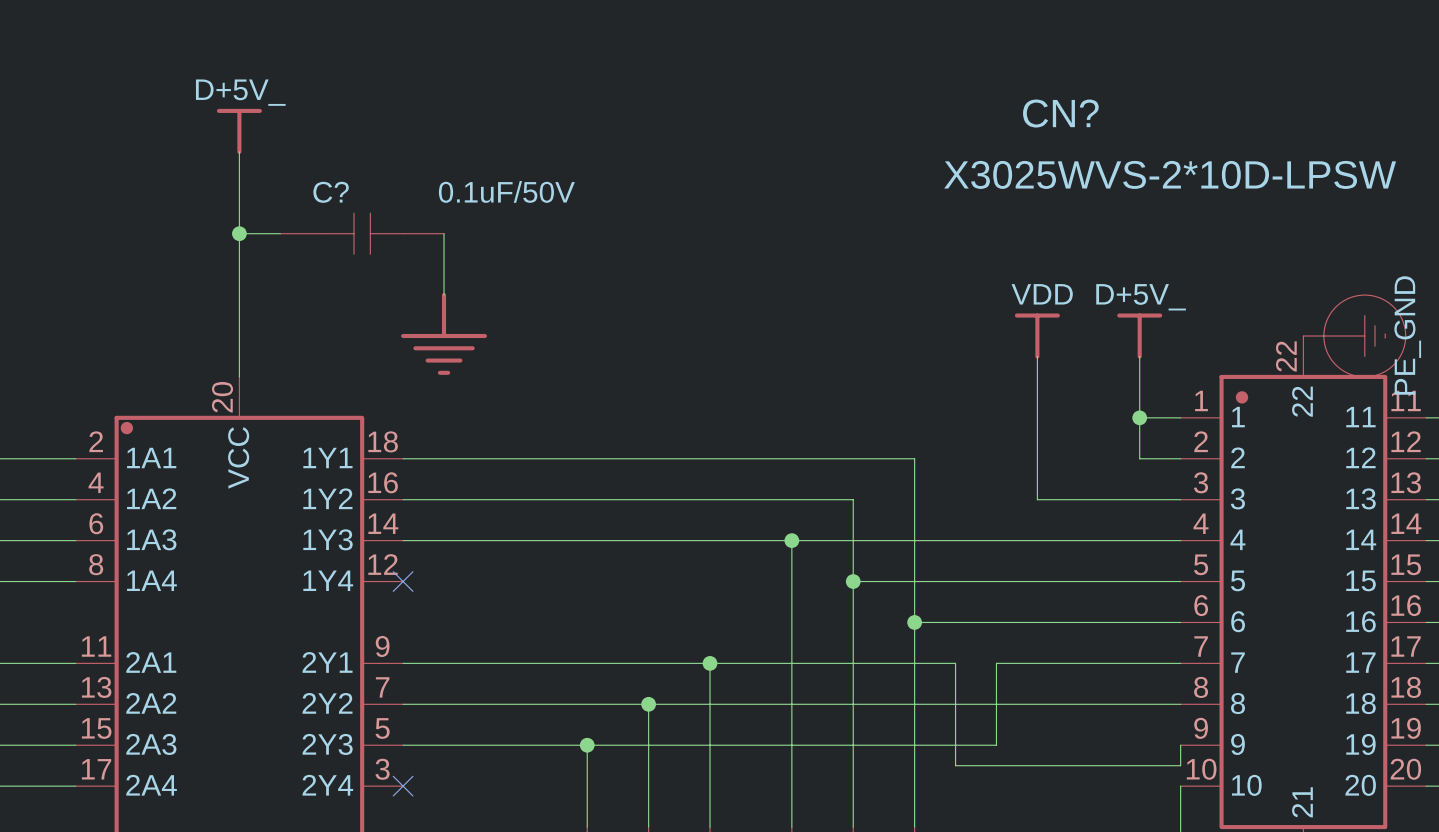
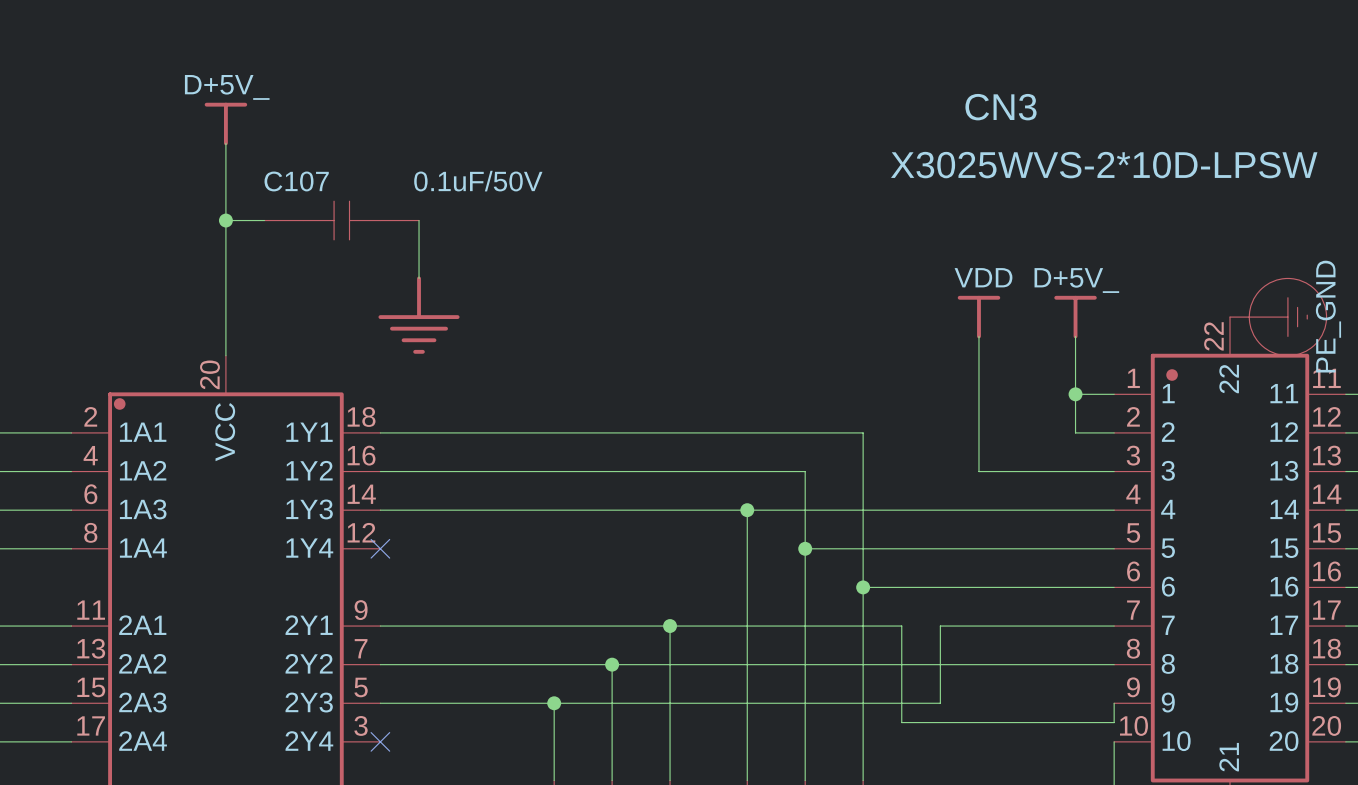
CN? name: CN? (1060, 113) -> CN3 (1001, 107)
C? name: C? (331, 192) -> C107 (296, 181)

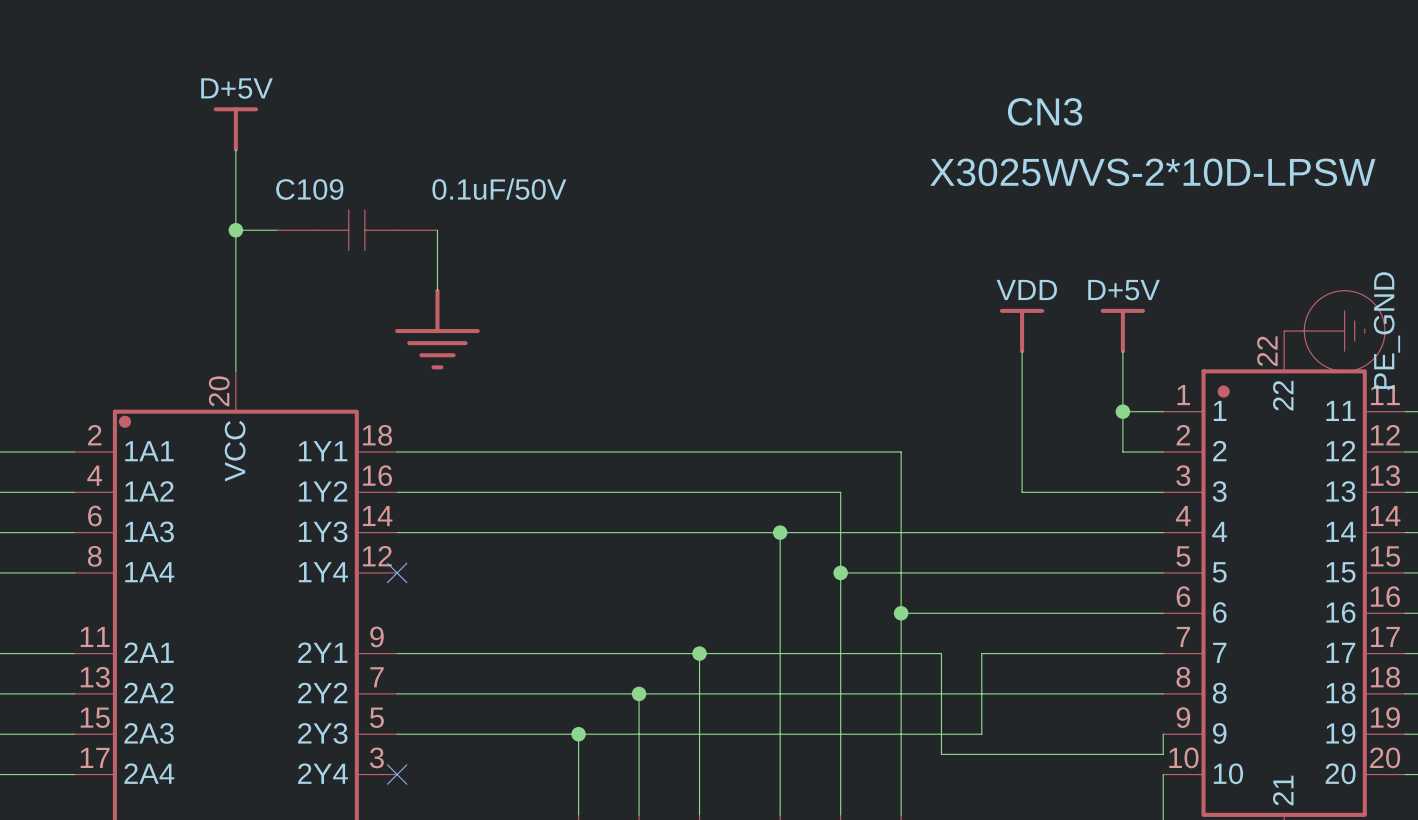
power symbol: D+5V_ (225, 123) -> D+5V (235, 129)
C107 name: C107 (296, 181) -> C109 (309, 189)
power symbol: D+5V_ (1075, 317) -> D+5V (1122, 331)

